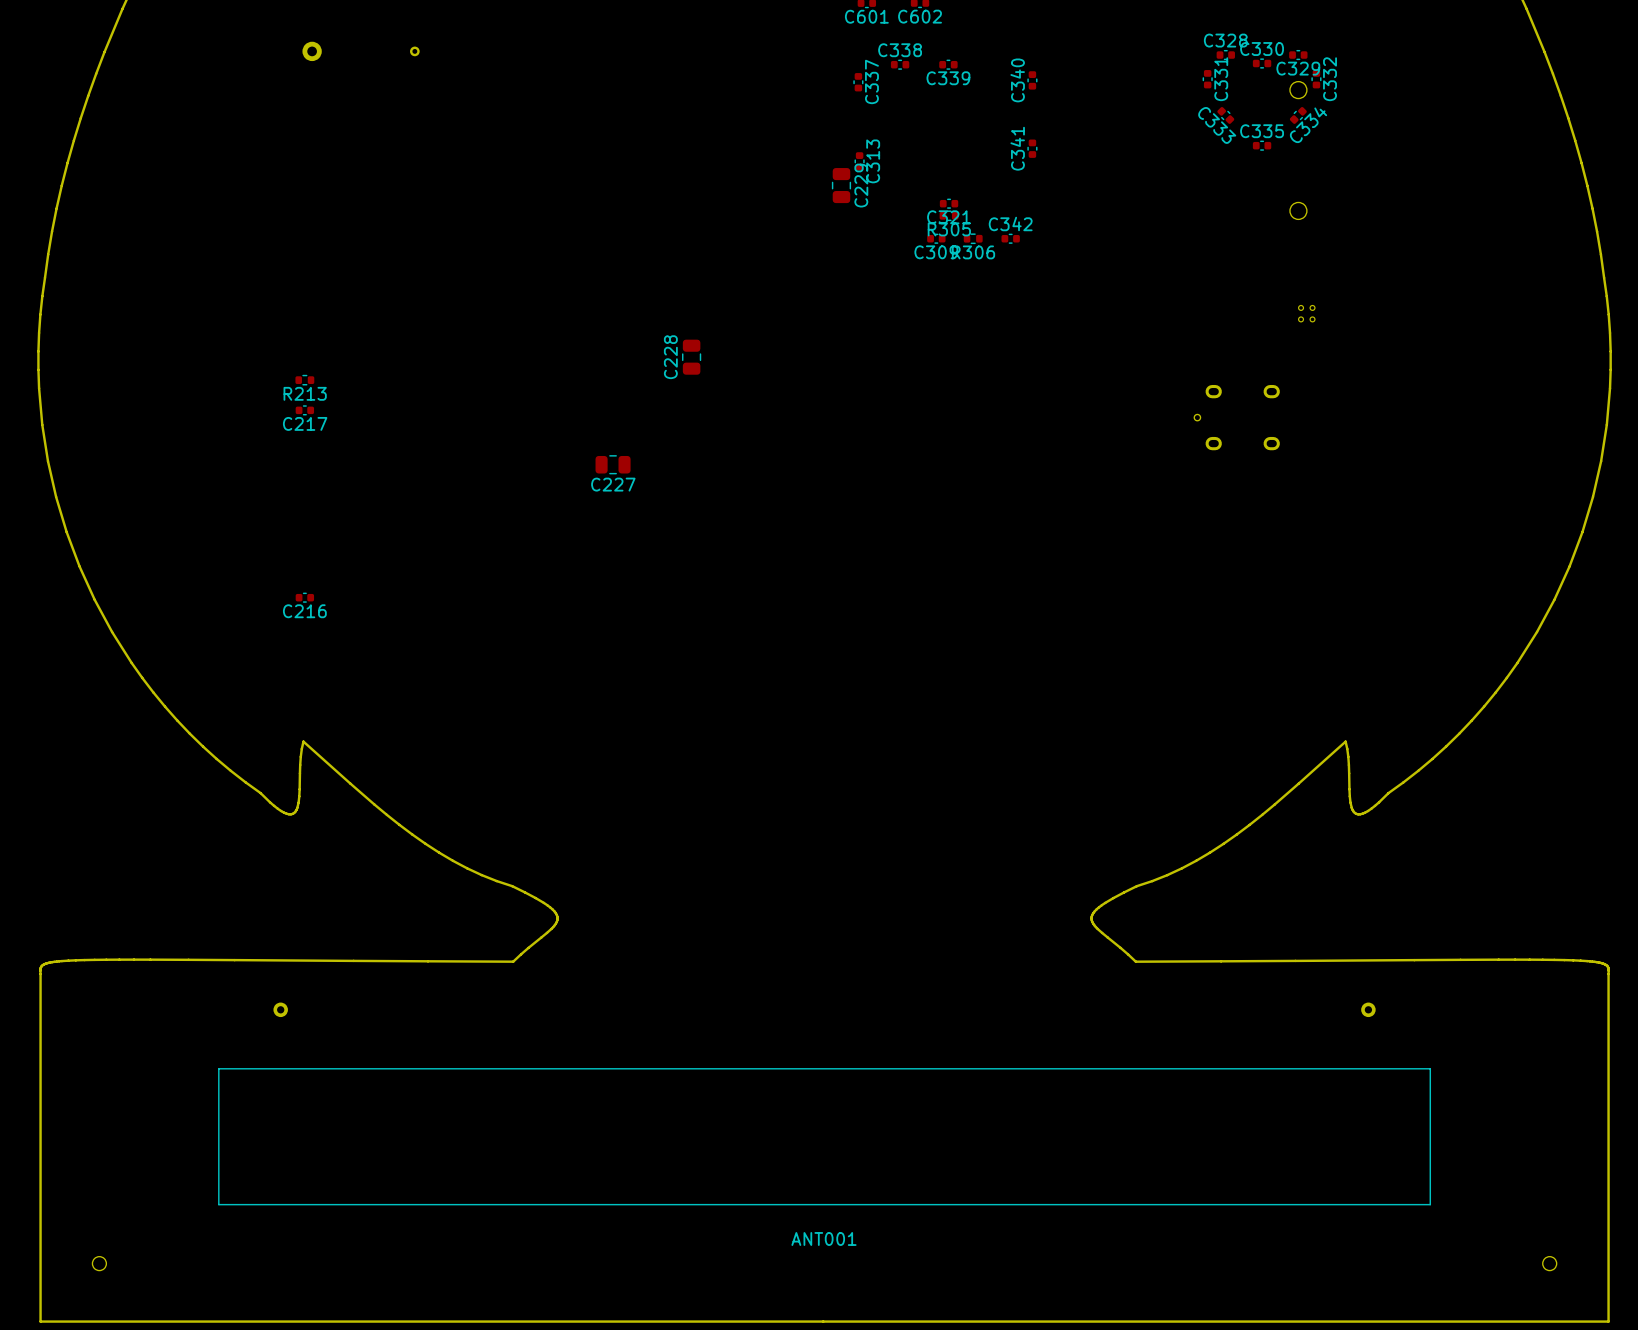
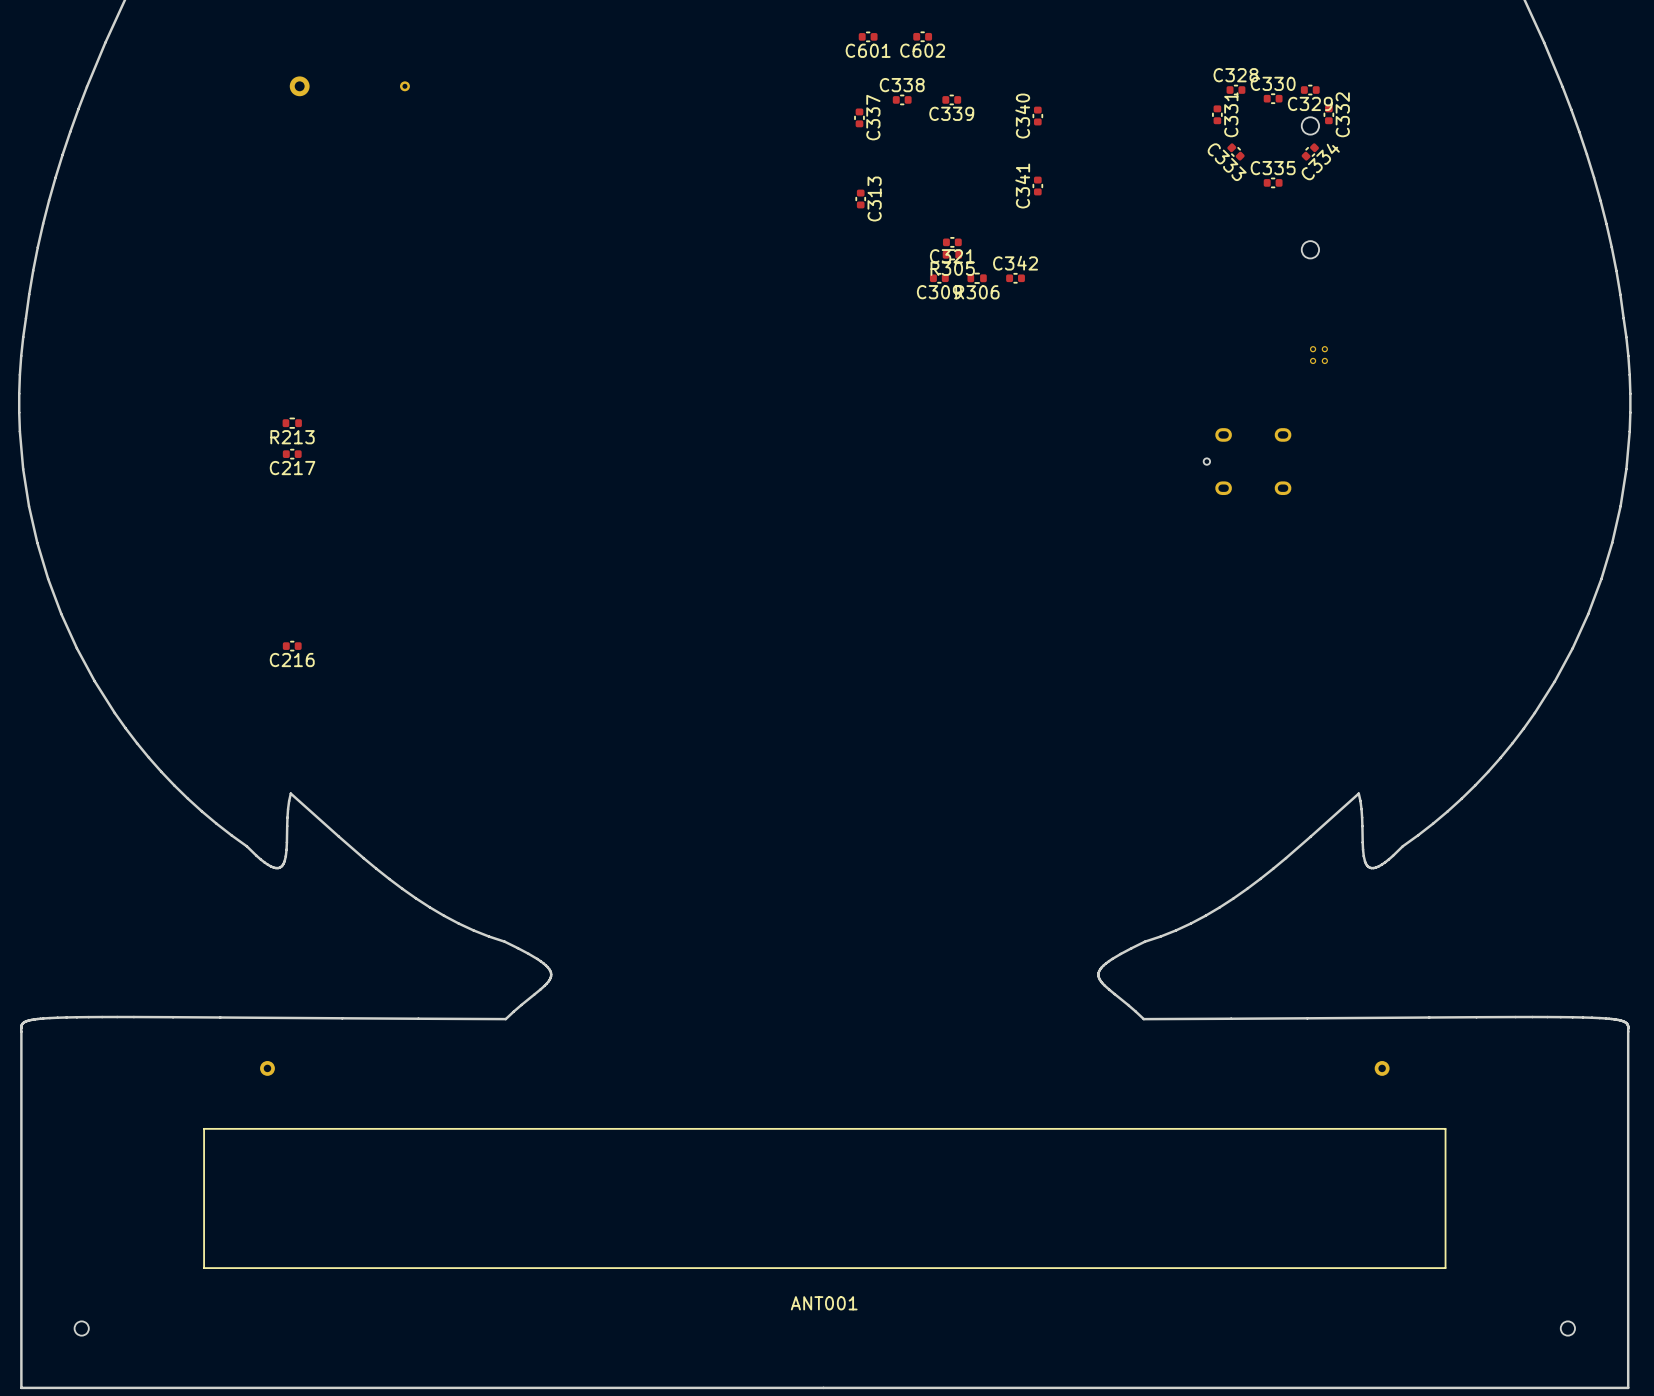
C229: (841, 185) -> none
C228: (691, 357) -> none
C227: (613, 464) -> none

